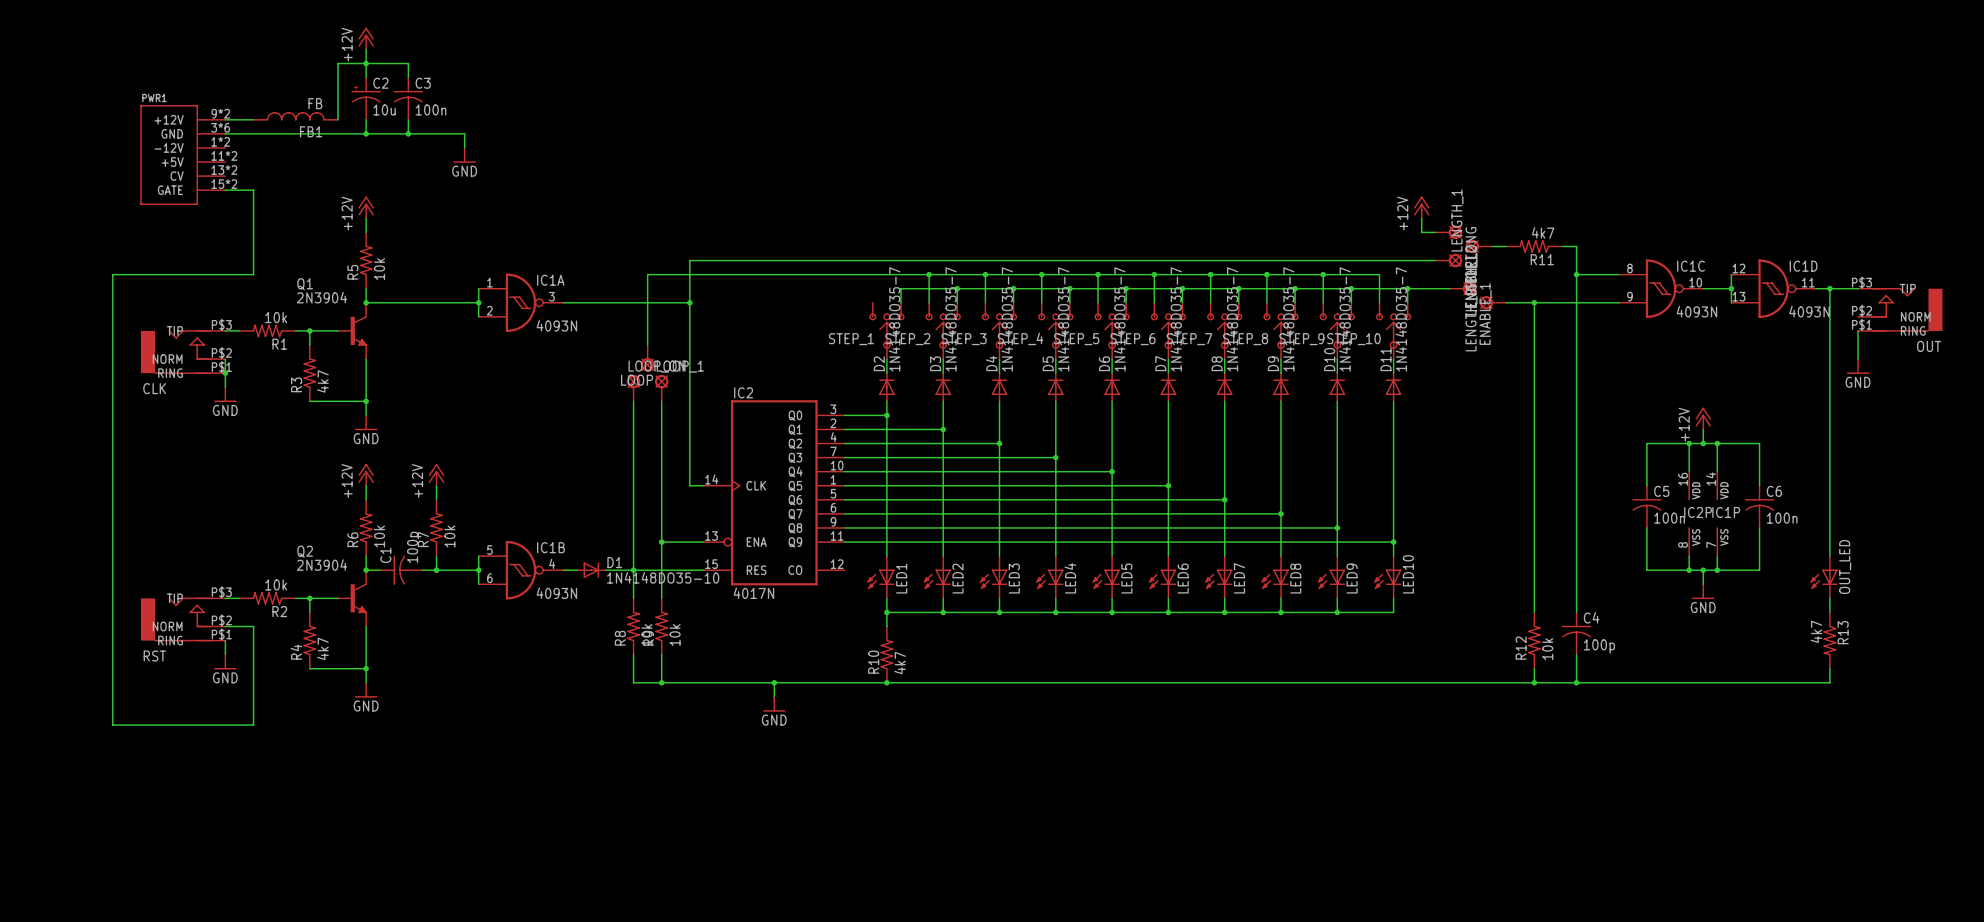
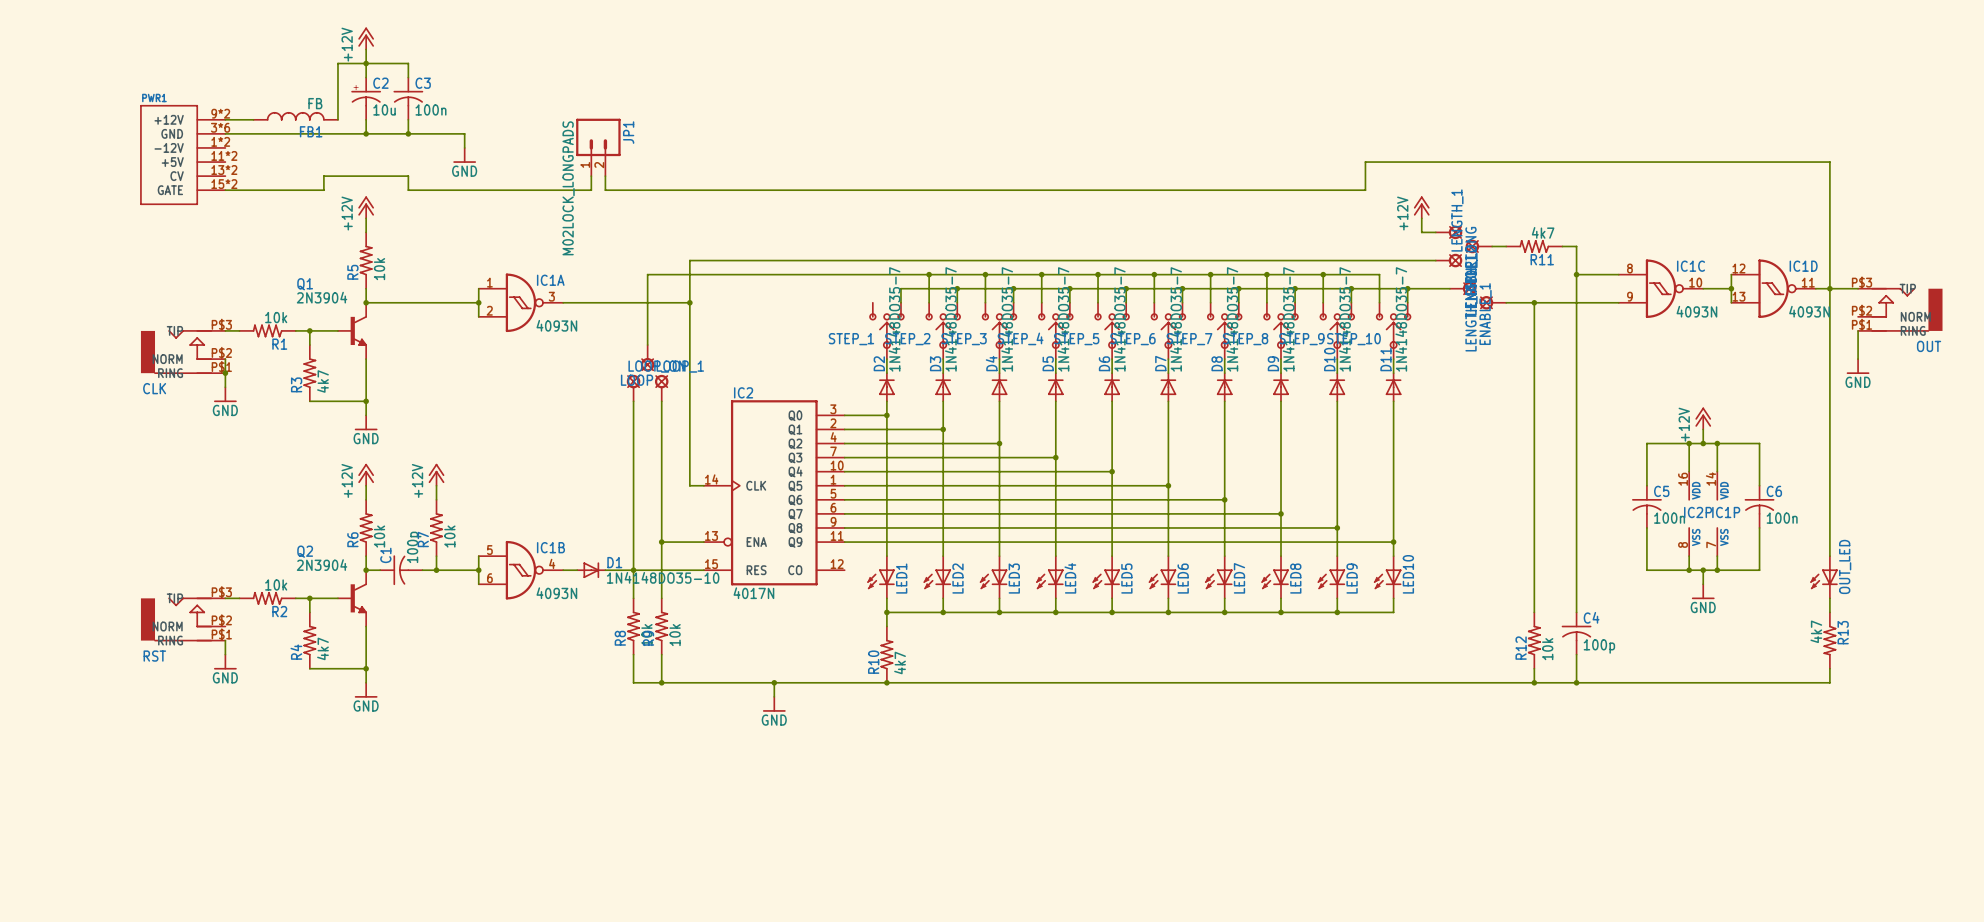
JP1: none -> M02LOCK_LONGPADS (598, 147)
wire: none -> (605, 176) (605, 190) (1365, 190) (1365, 162) (1829, 162) (1829, 288)
wire: (253, 190) (253, 274) (112, 274) (112, 725) (253, 725) (253, 626) (225, 626) -> (253, 190) (323, 190) (323, 176) (408, 176) (408, 190) (591, 190) (591, 176)

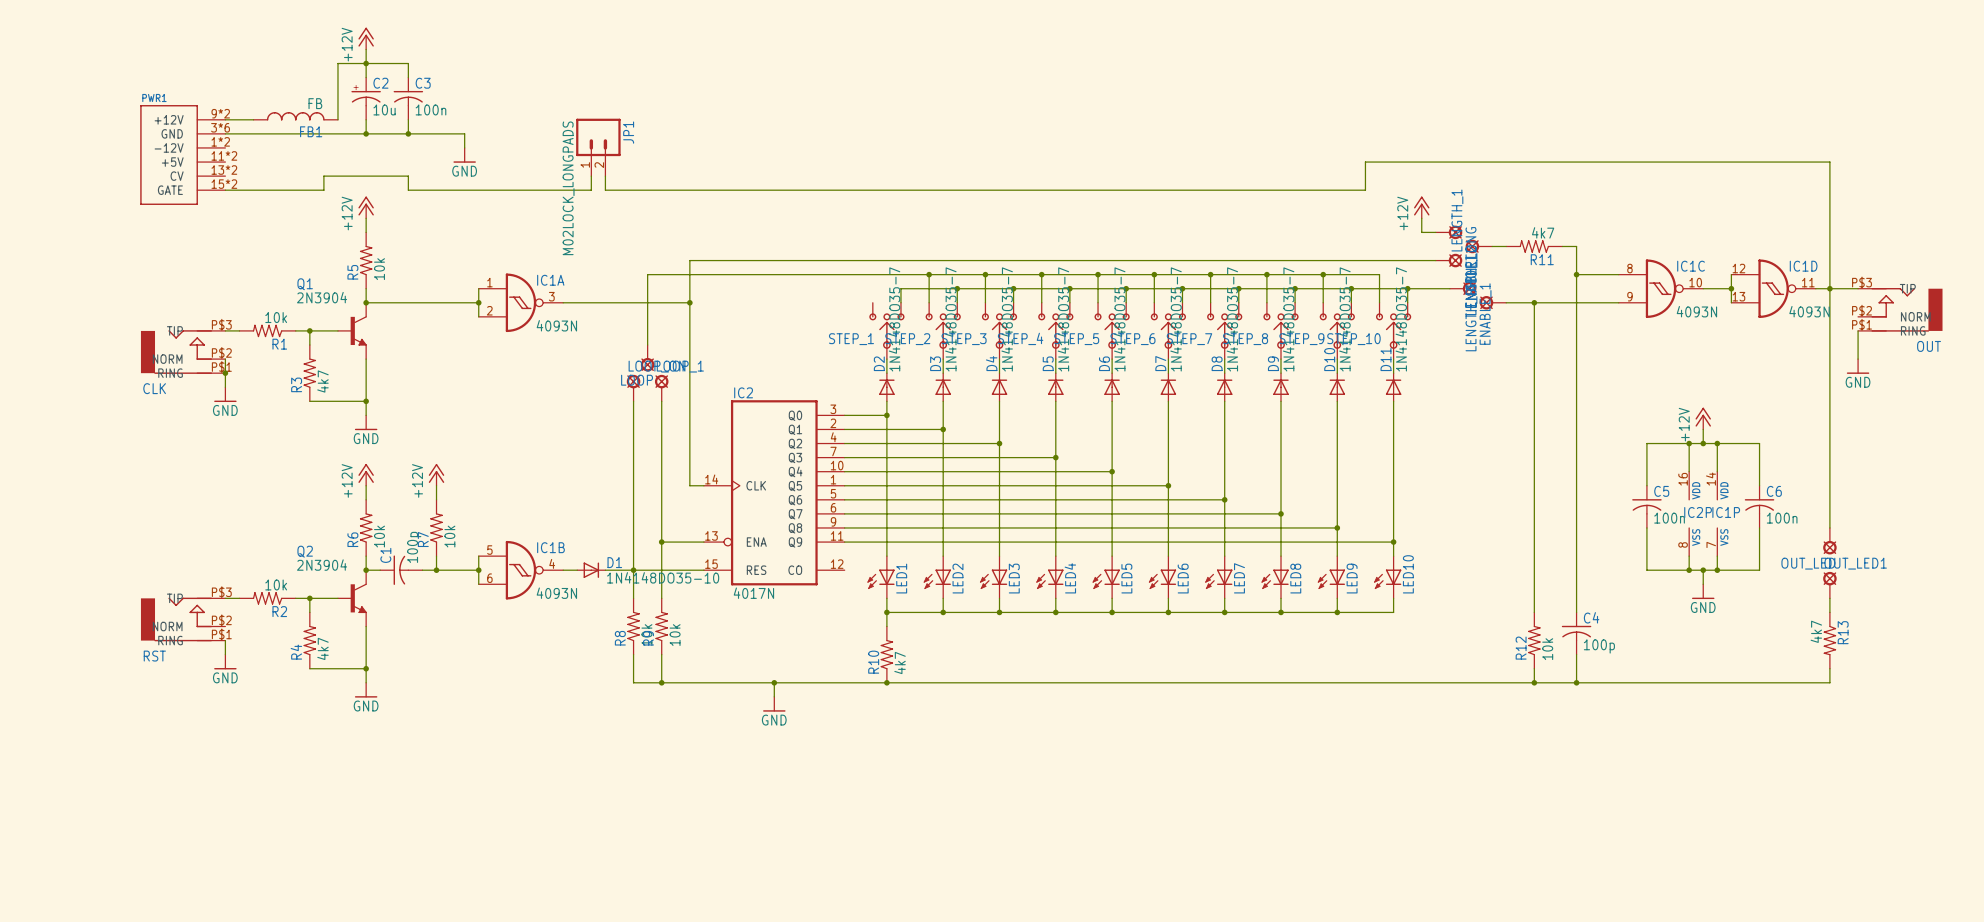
OUT_LED: none -> (1829, 541)
OUT_LED: (1824, 577) -> none
OUT_LED1: none -> (1829, 585)

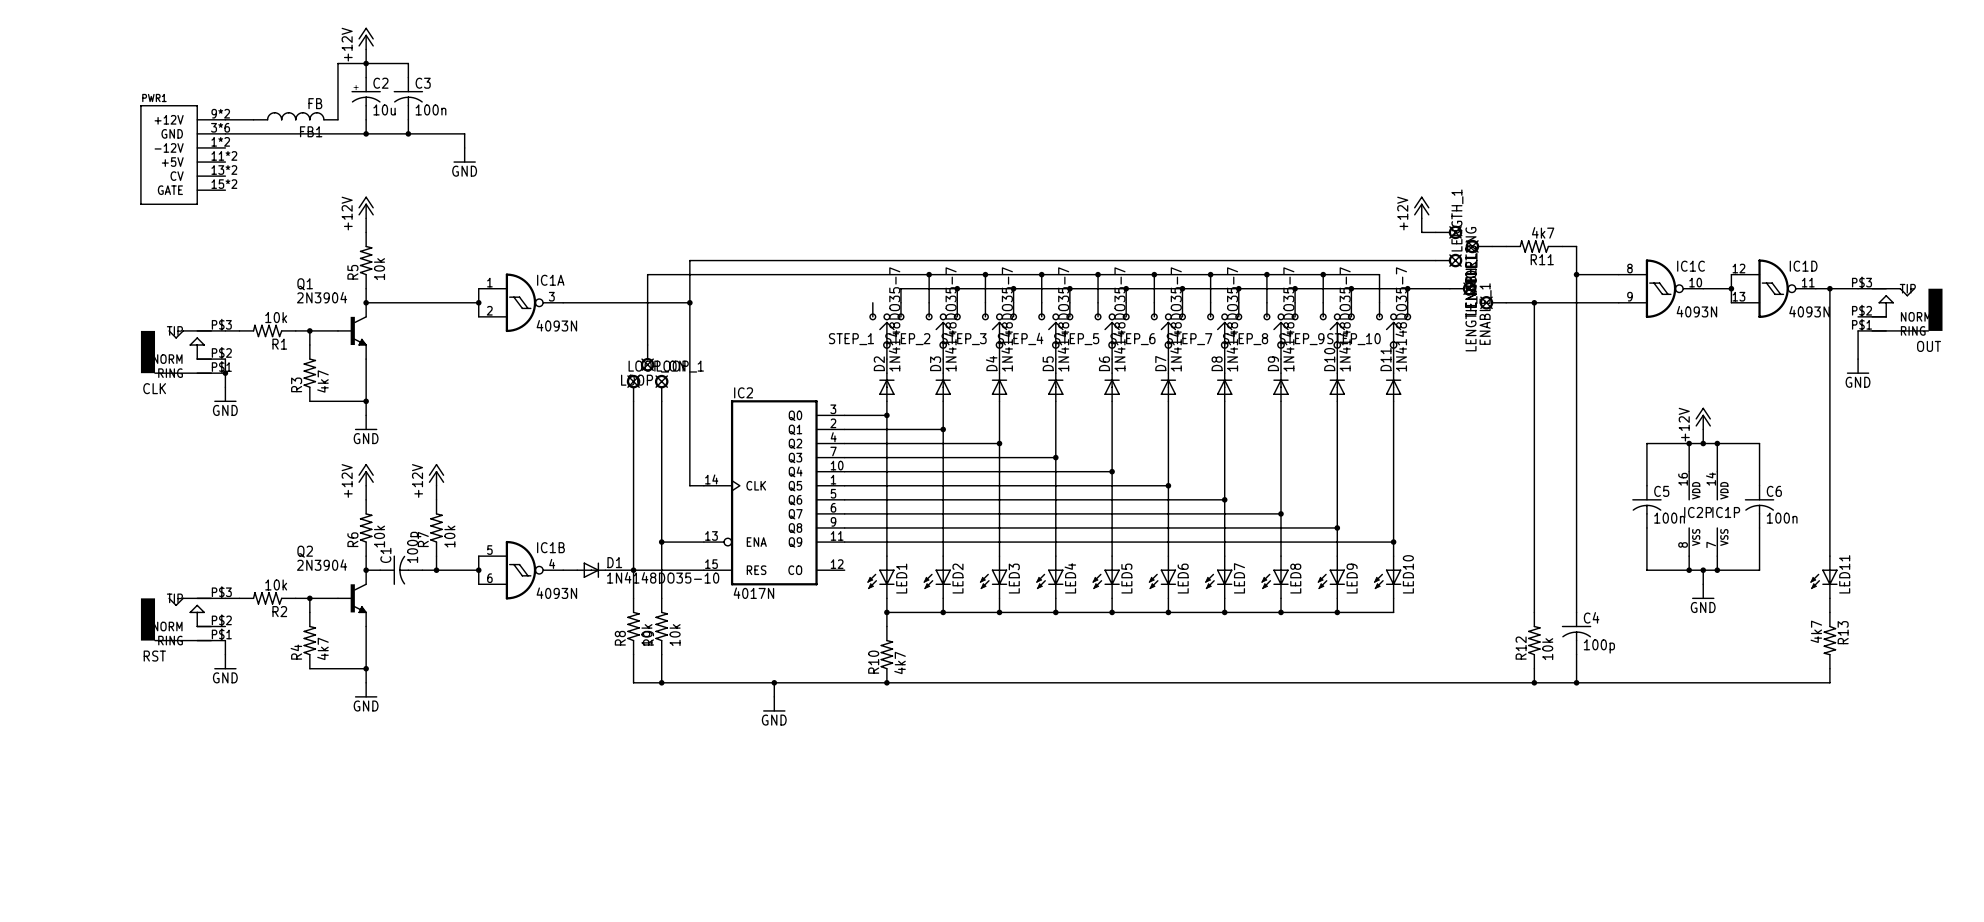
JP1: M02LOCK_LONGPADS (598, 147) -> none
wire: (591, 176) (591, 190) (408, 190) (408, 176) (323, 176) (323, 190) (225, 190) -> none
wire: (605, 176) (605, 190) (1365, 190) (1365, 162) (1829, 162) (1829, 288) -> none
OUT_LED: (1829, 541) -> none
LED11: none -> (1824, 577)
OUT_LED1: (1829, 585) -> none

